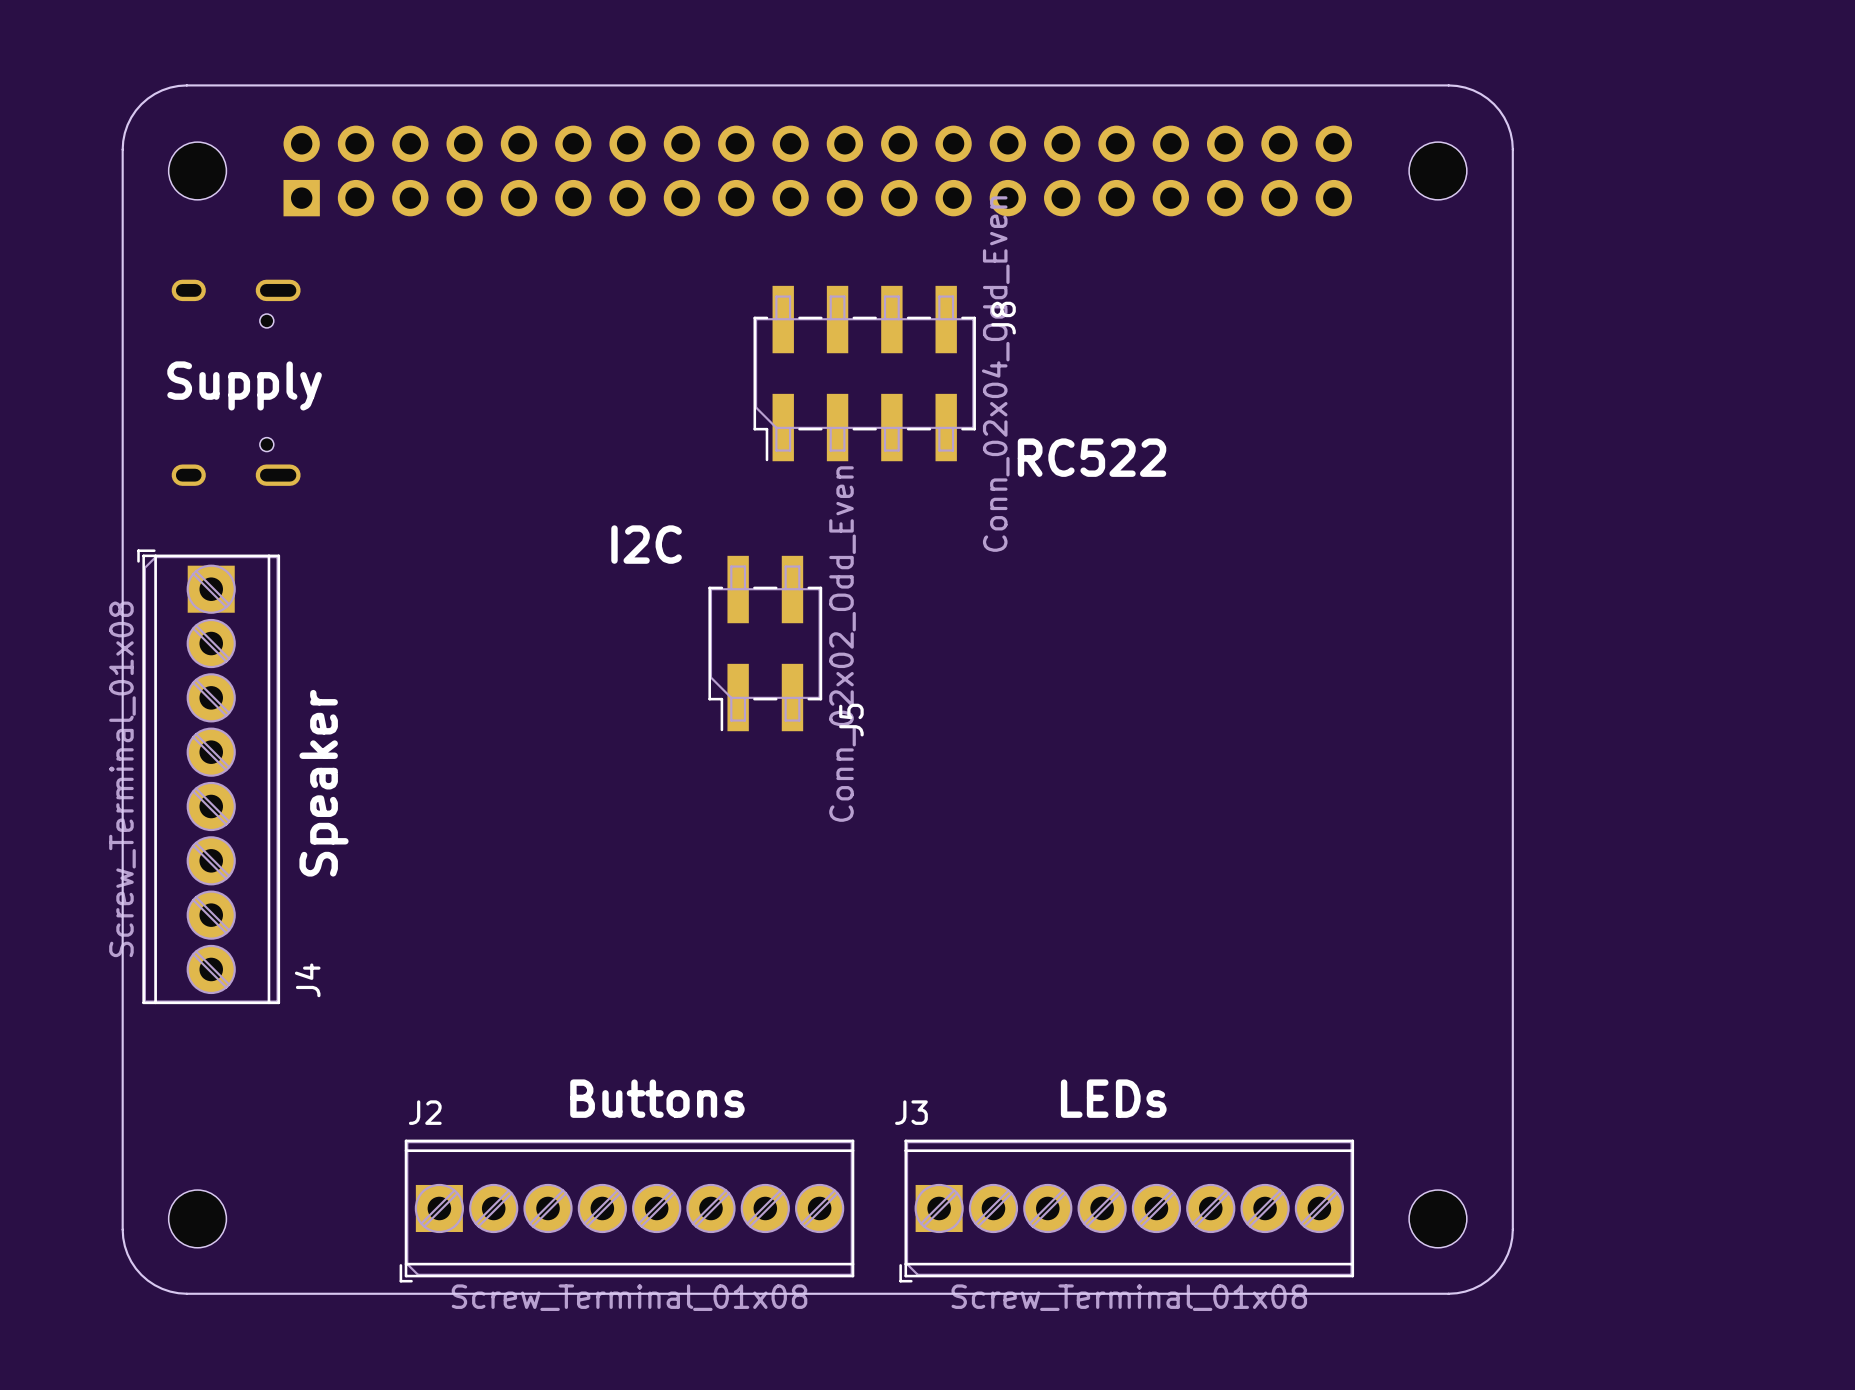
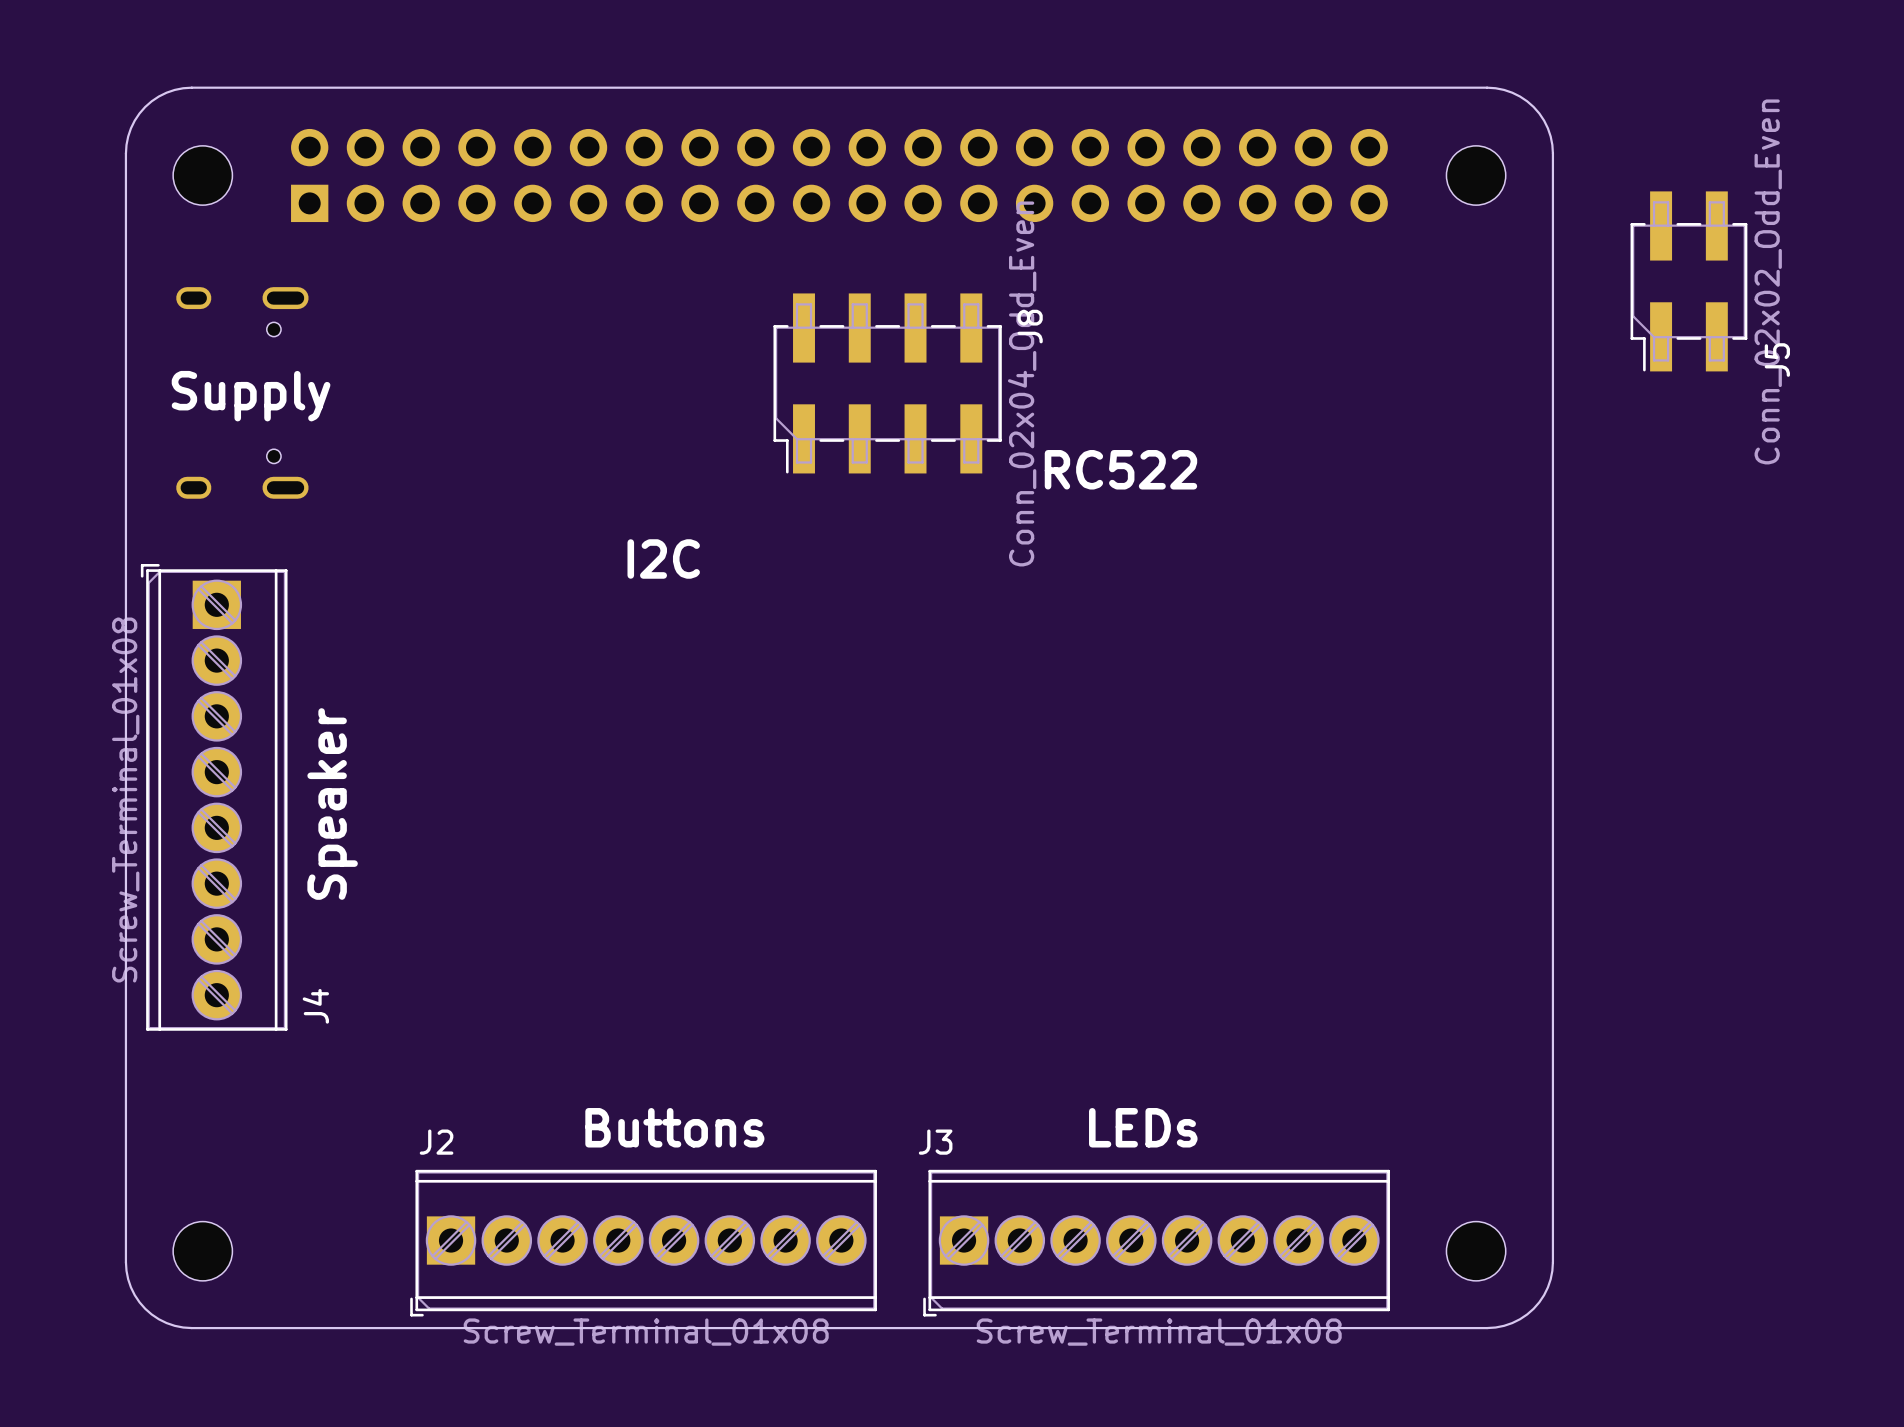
J5 position: (765, 643) -> (1688, 281)

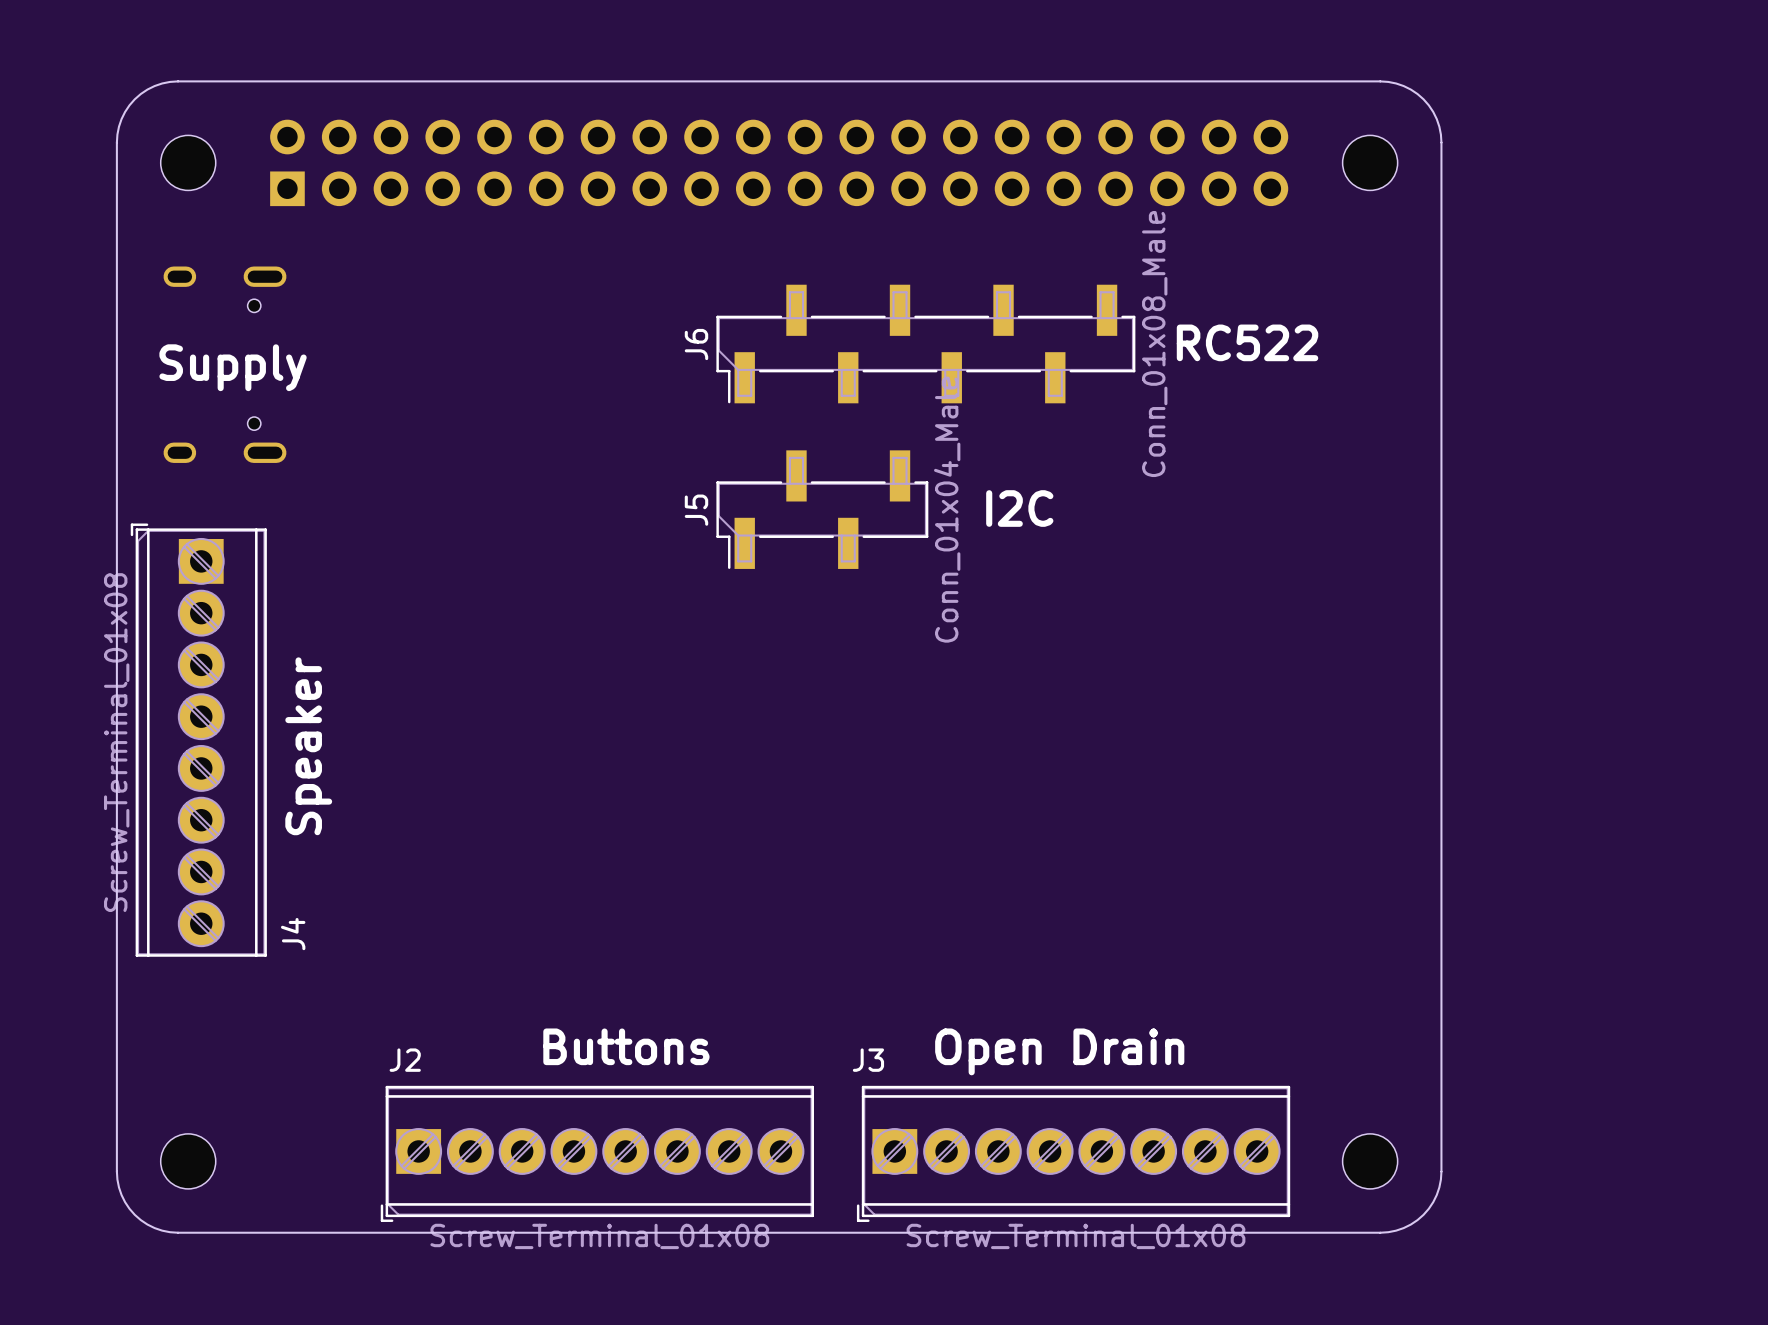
J5 footprint: [1630, 191, 1748, 372] -> [716, 450, 929, 569]
J5 value: Conn_02x02_Odd_Even (1768, 281) -> Conn_01x04_Male (947, 509)
J5 name position: J5 (1777, 360) -> J5 (696, 510)
J6: none -> Conn_01x08_Male (925, 344)
J8: Conn_02x04_Odd_Even (887, 383) -> none
text position: RC522 (1120, 469) -> RC522 (1247, 342)
text position: I2C (663, 558) -> I2C (1019, 508)
text: LEDs (1143, 1127) -> Open Drain (1059, 1051)

